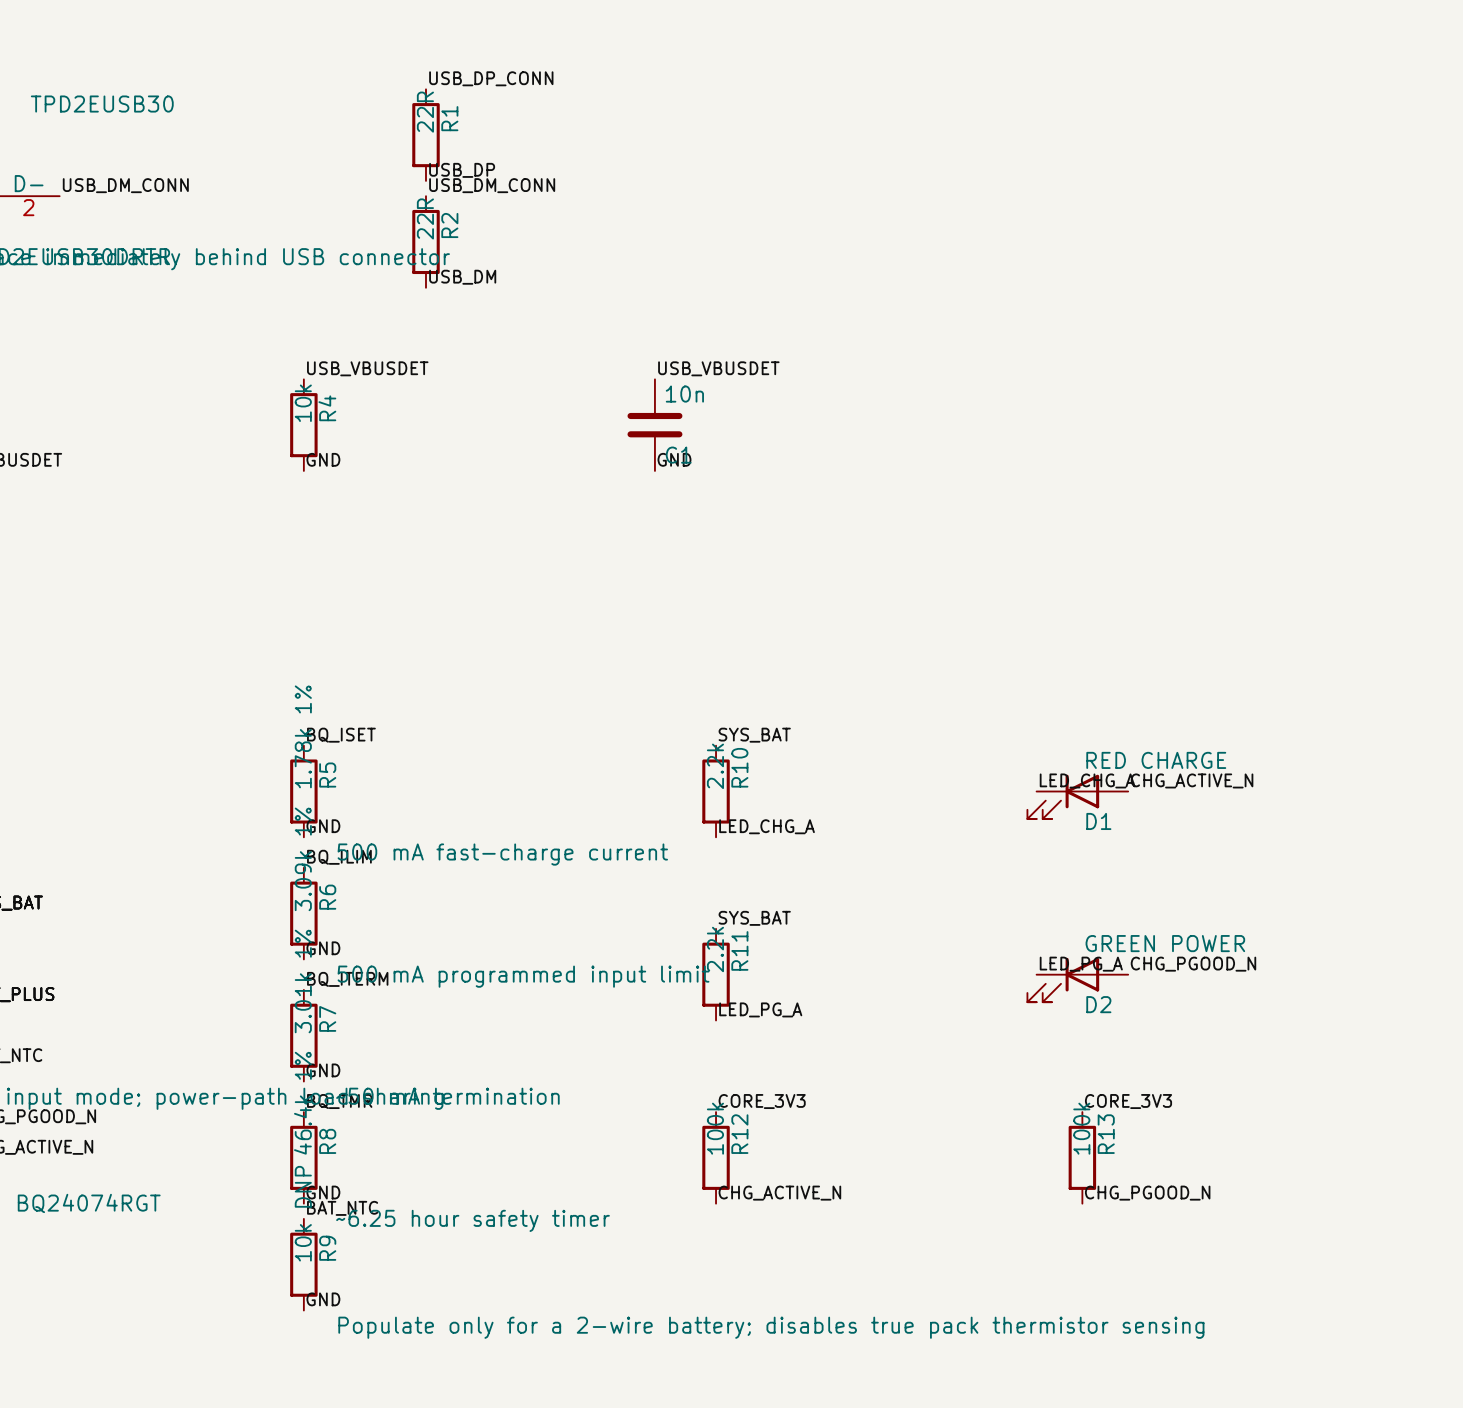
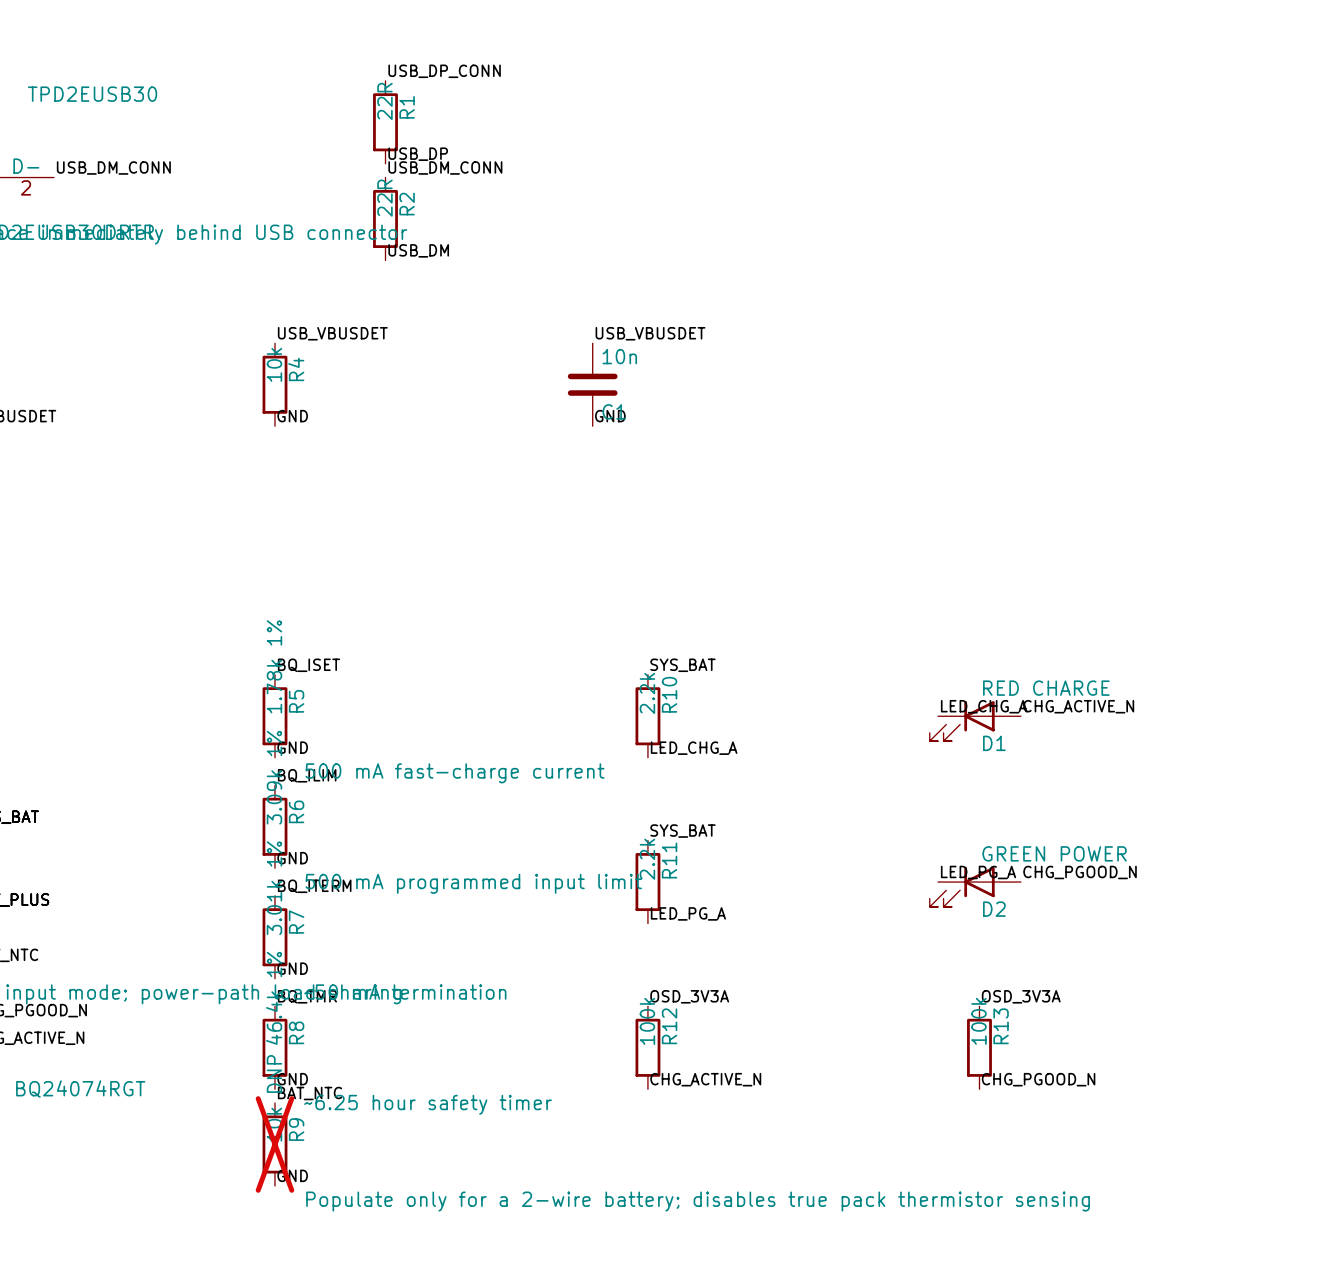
label: CORE_3V3 (762, 1101) -> OSD_3V3A (689, 996)
label: CORE_3V3 (1128, 1101) -> OSD_3V3A (1021, 996)
R9 do-not-place cross: none -> (274, 1144)

